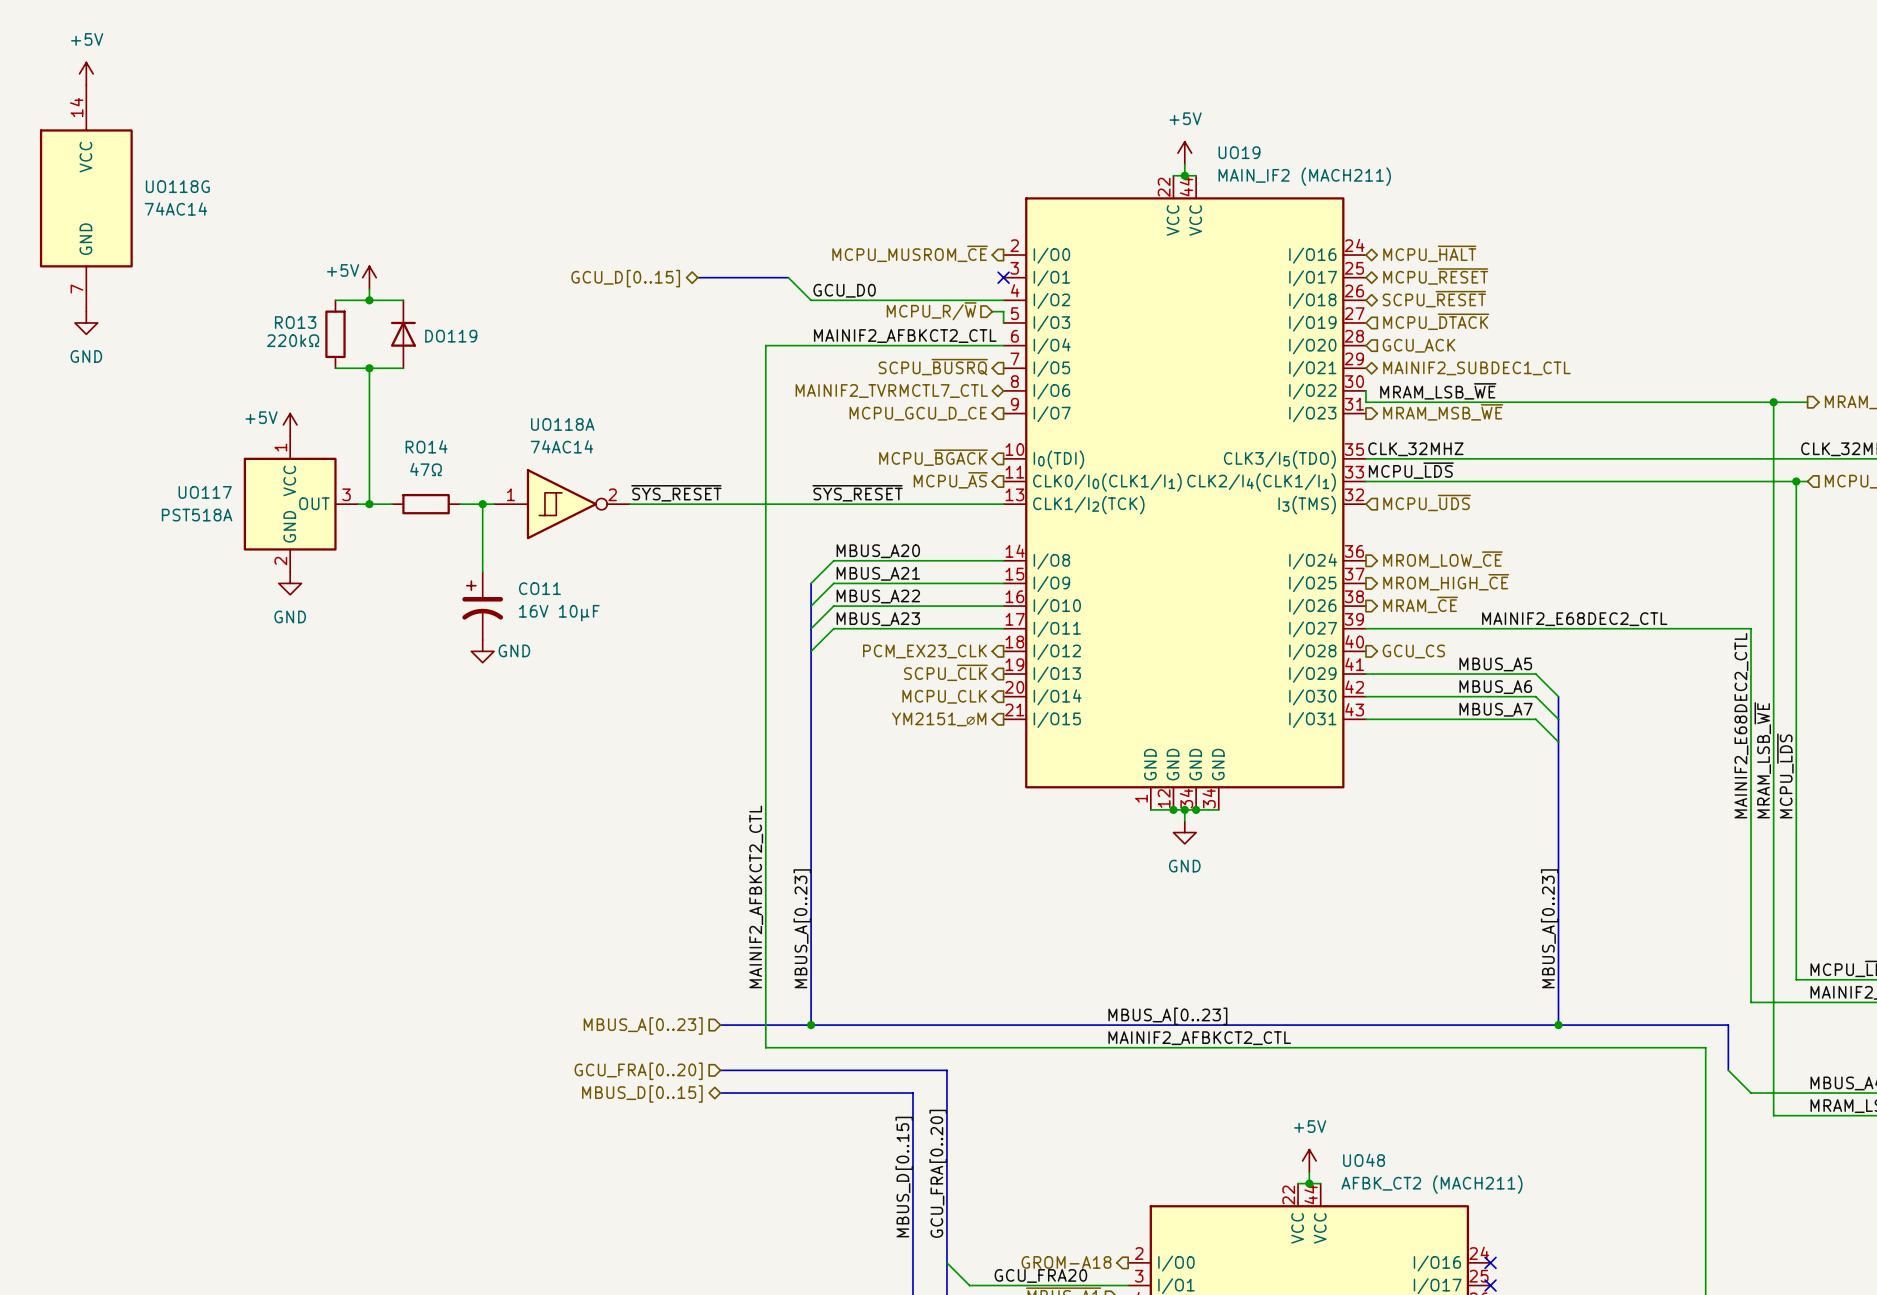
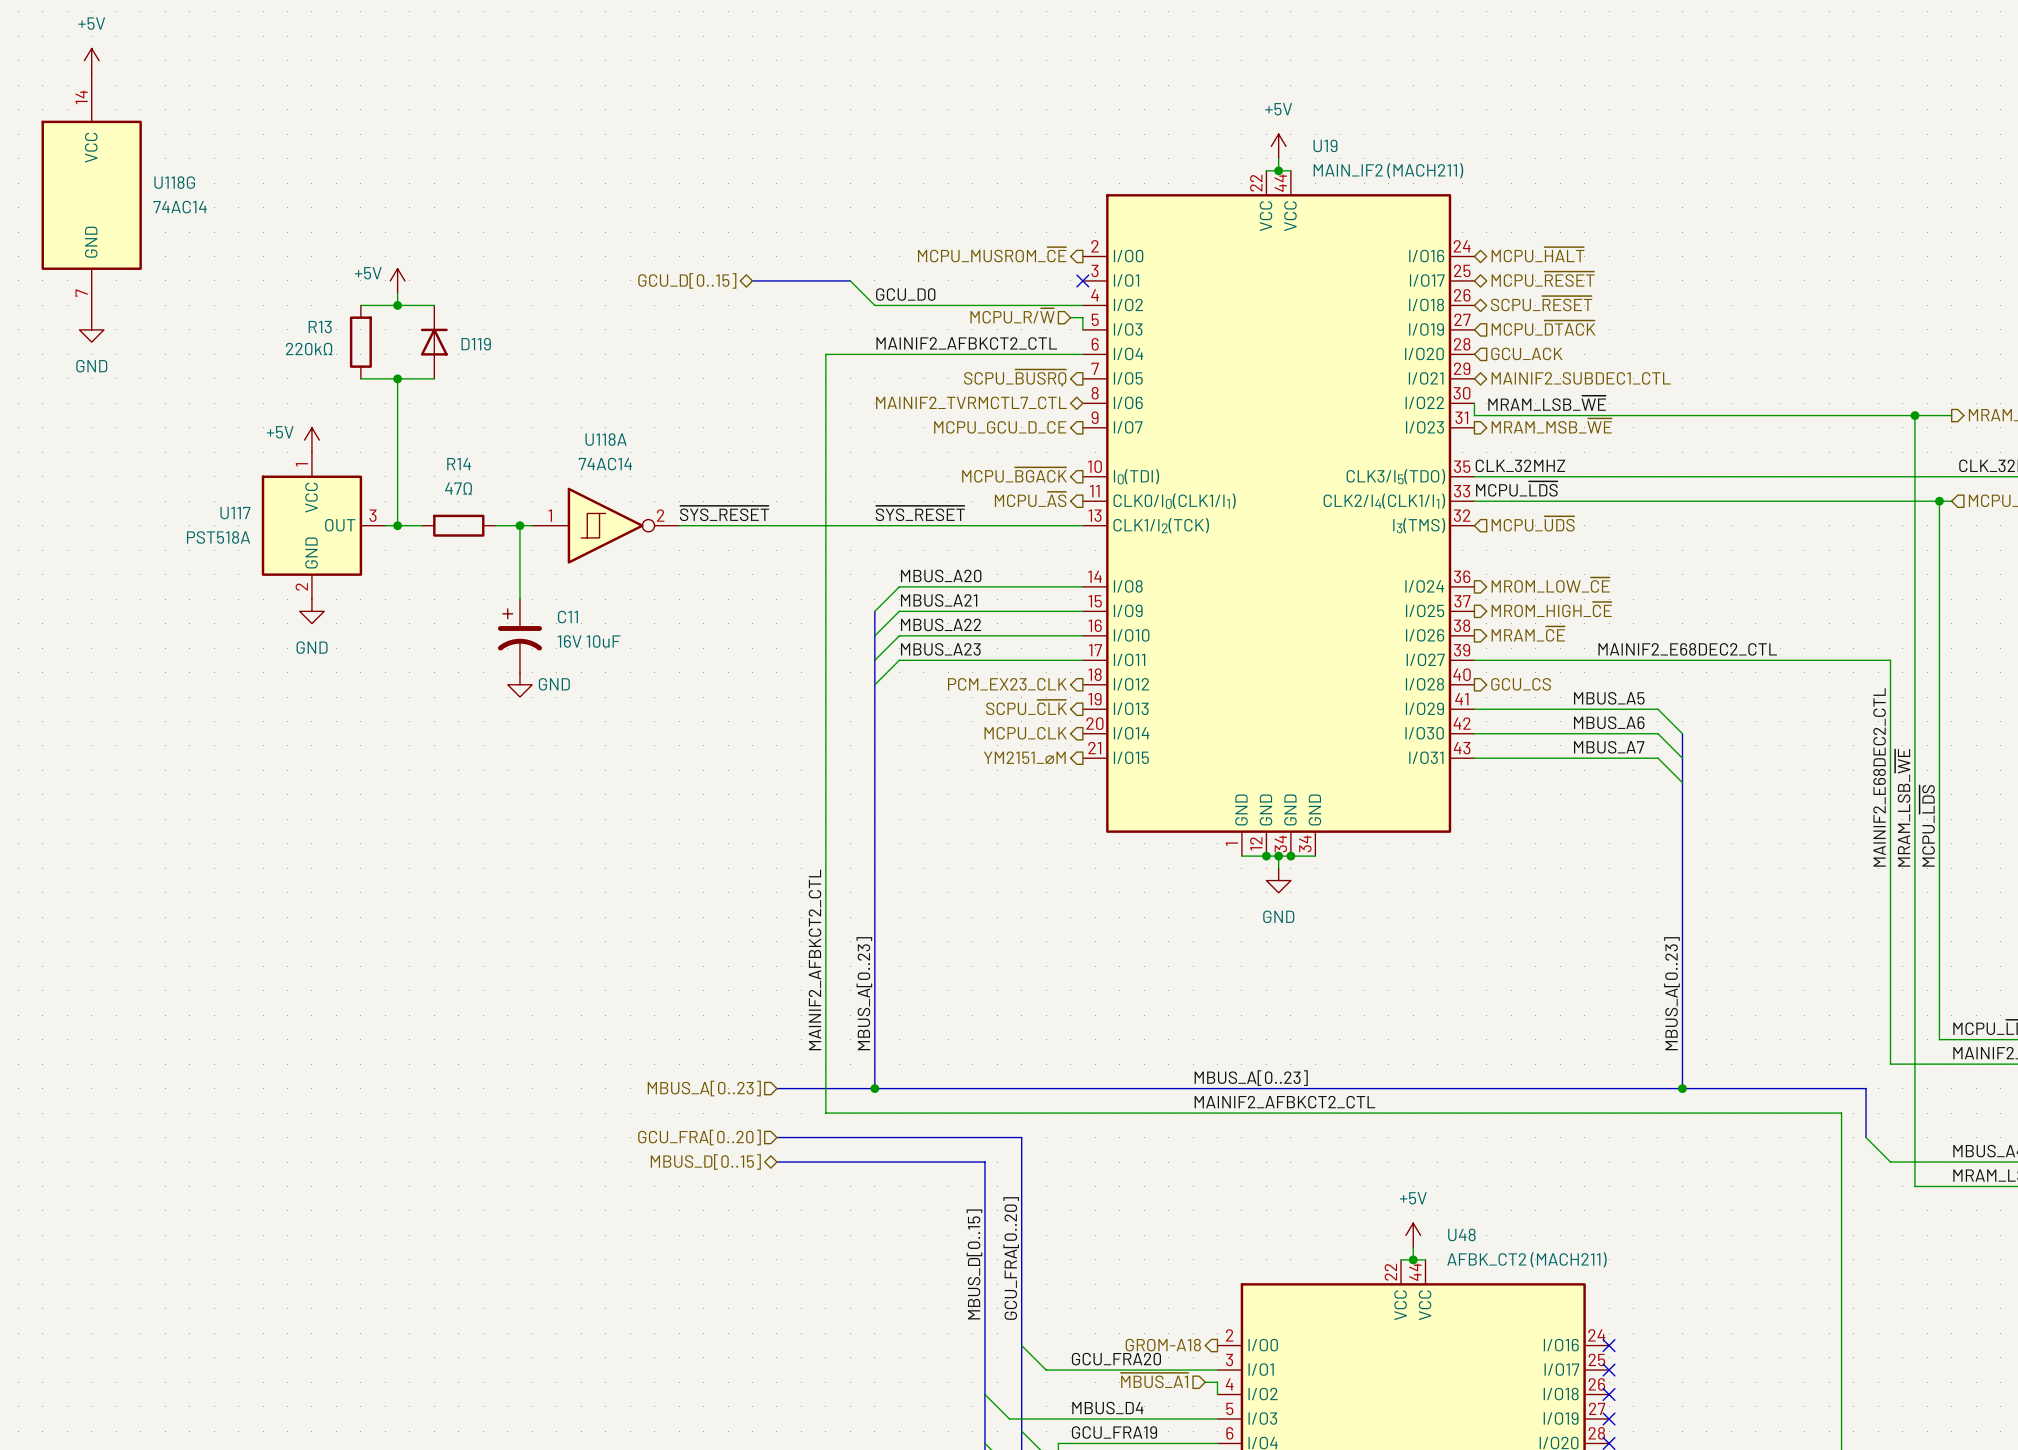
UO19 name: UO19 (1239, 152) -> U19 (1325, 145)
UO118G name: UO118G (177, 186) -> U118G (174, 182)
RO13 name: RO13 (295, 322) -> R13 (320, 327)
DO119 name: DO119 (451, 336) -> D119 (476, 344)
UO118A name: UO118A (562, 424) -> U118A (606, 439)
RO14 name: RO14 (426, 446) -> R14 (459, 464)
UO117 name: UO117 (205, 492) -> U117 (235, 513)
CO11 name: CO11 (539, 588) -> C11 (567, 617)
CO11 value: 16V 10μF (559, 613) -> 16V 10uF (589, 641)
UO48 name: UO48 (1364, 1160) -> U48 (1461, 1234)

